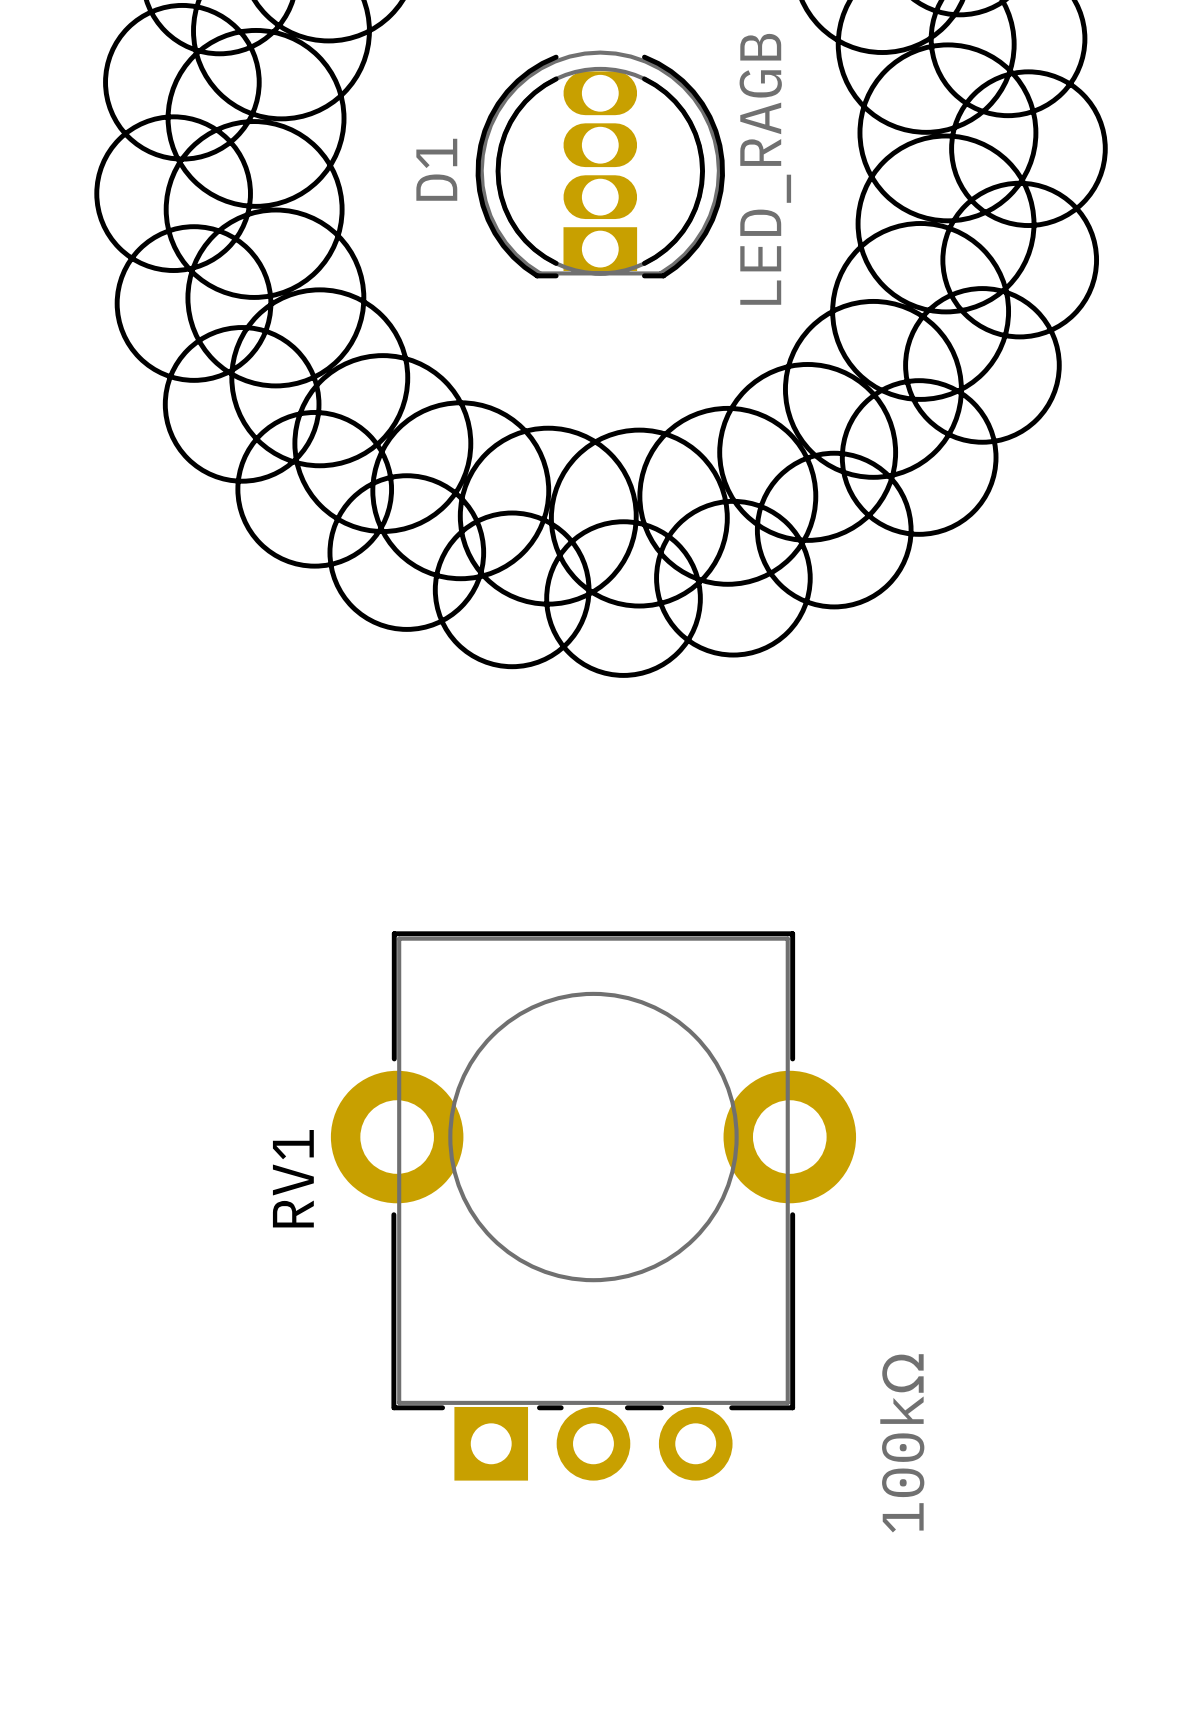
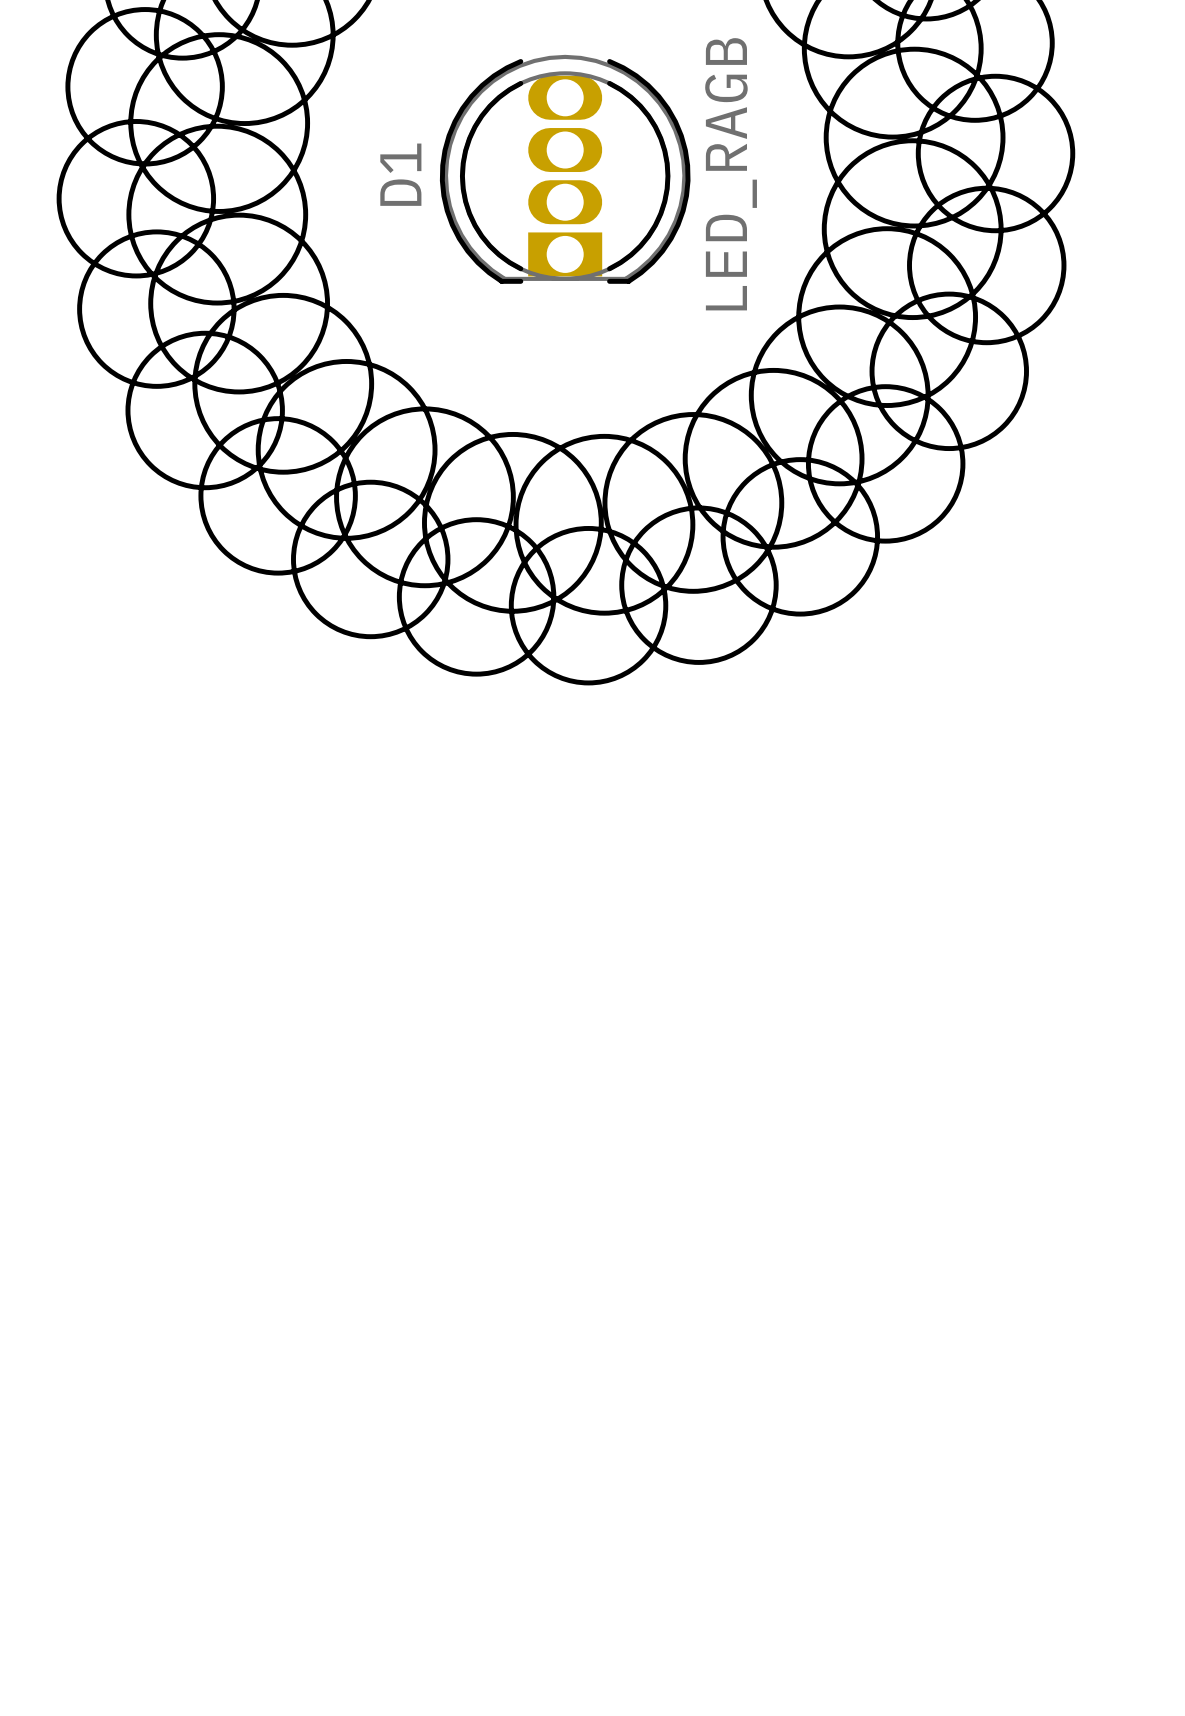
RV1: 100kΩ (593, 1205) -> none

